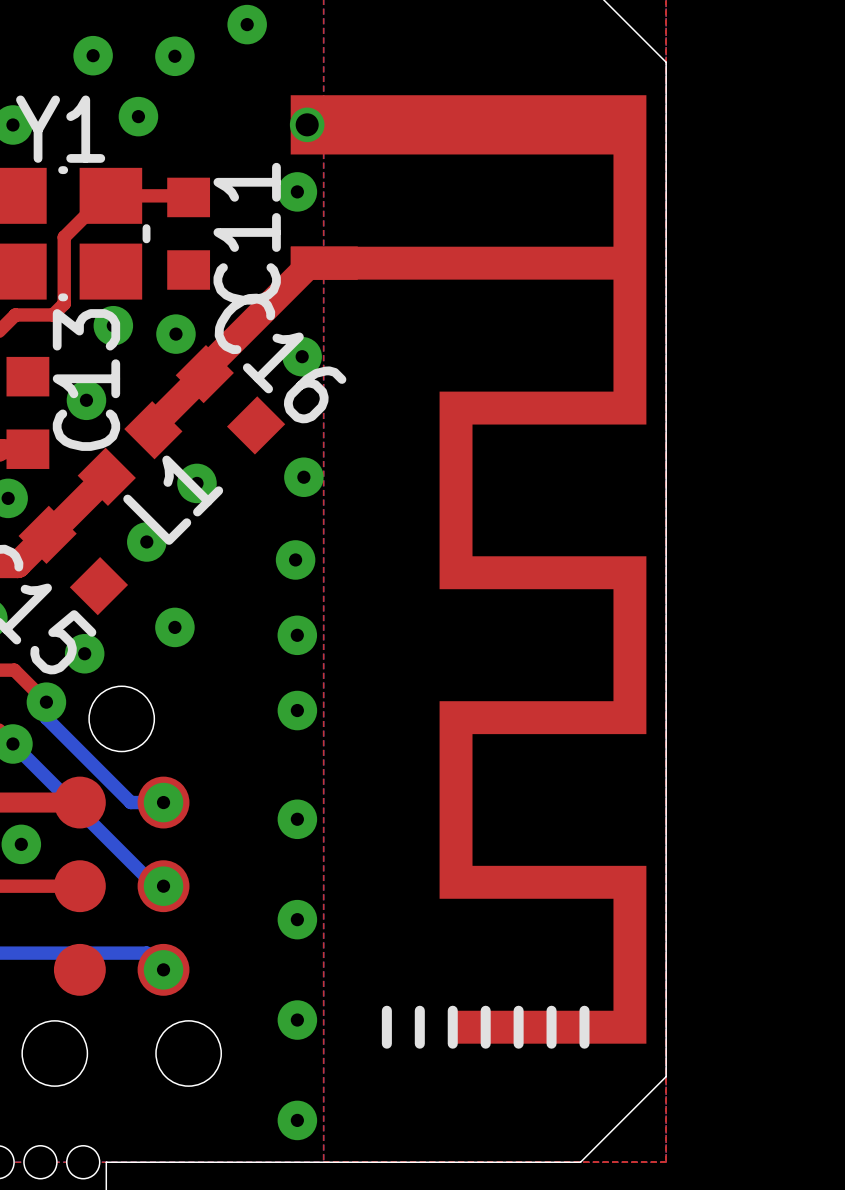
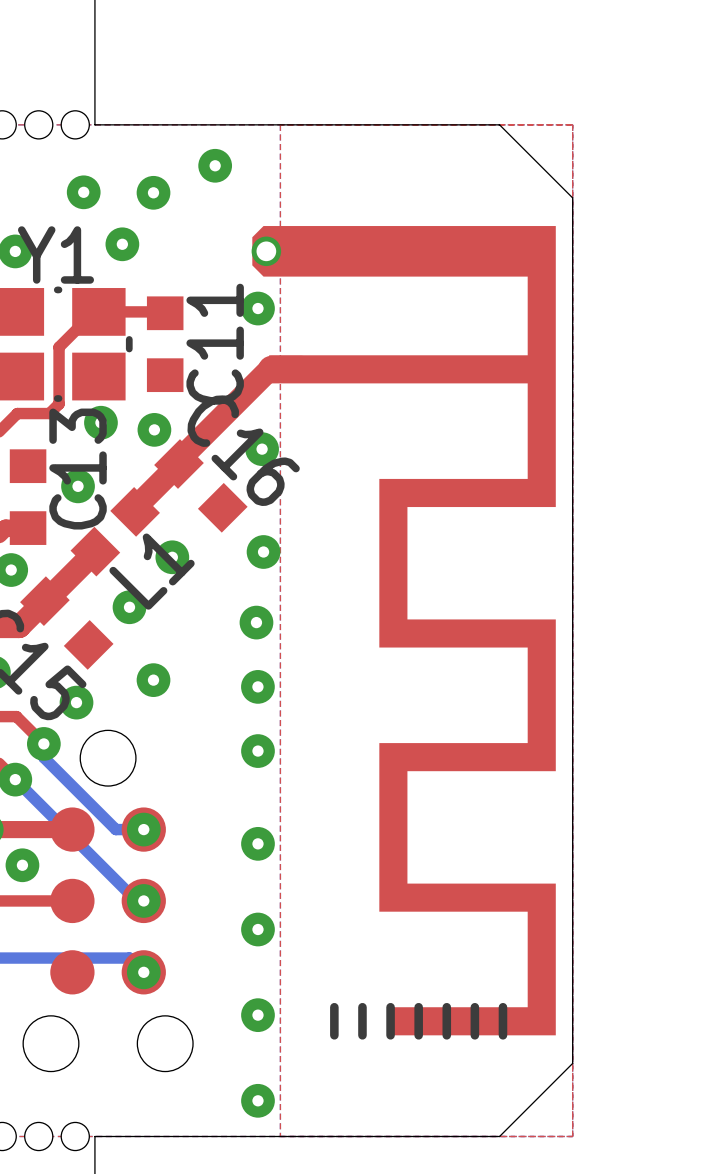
part footprint: [289, 95, 647, 1049] -> [251, 226, 556, 1040]

